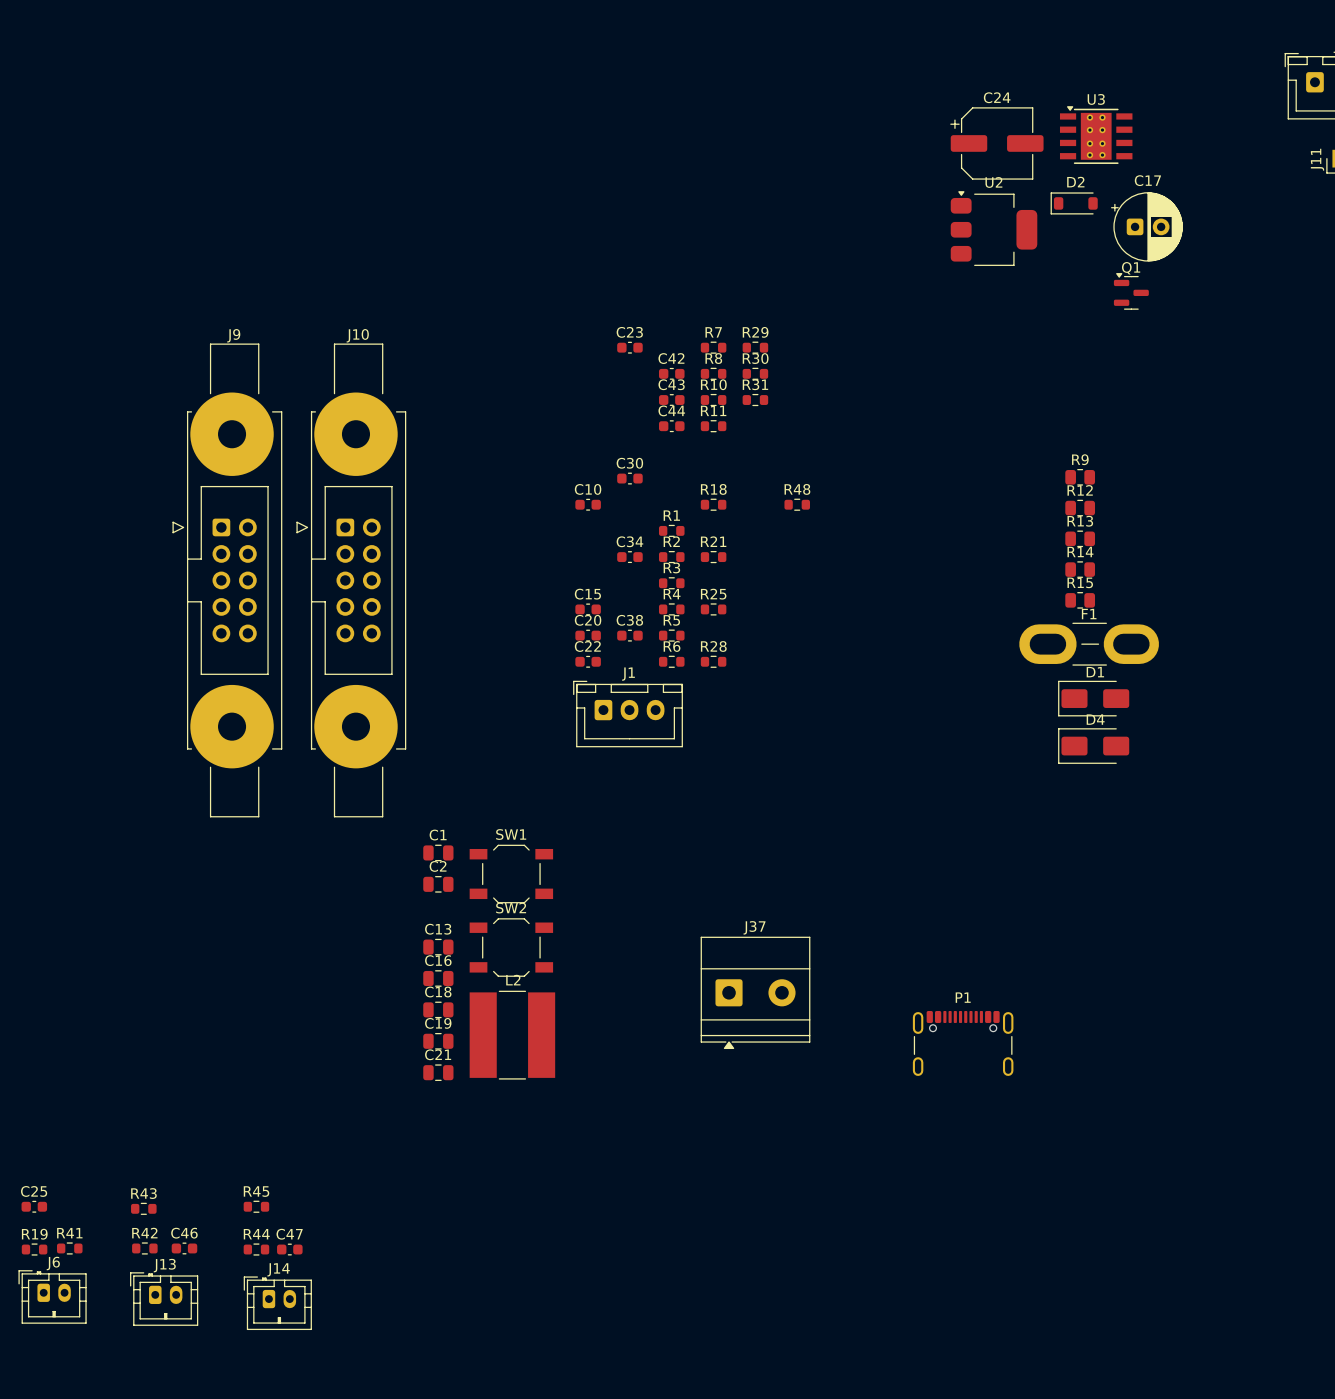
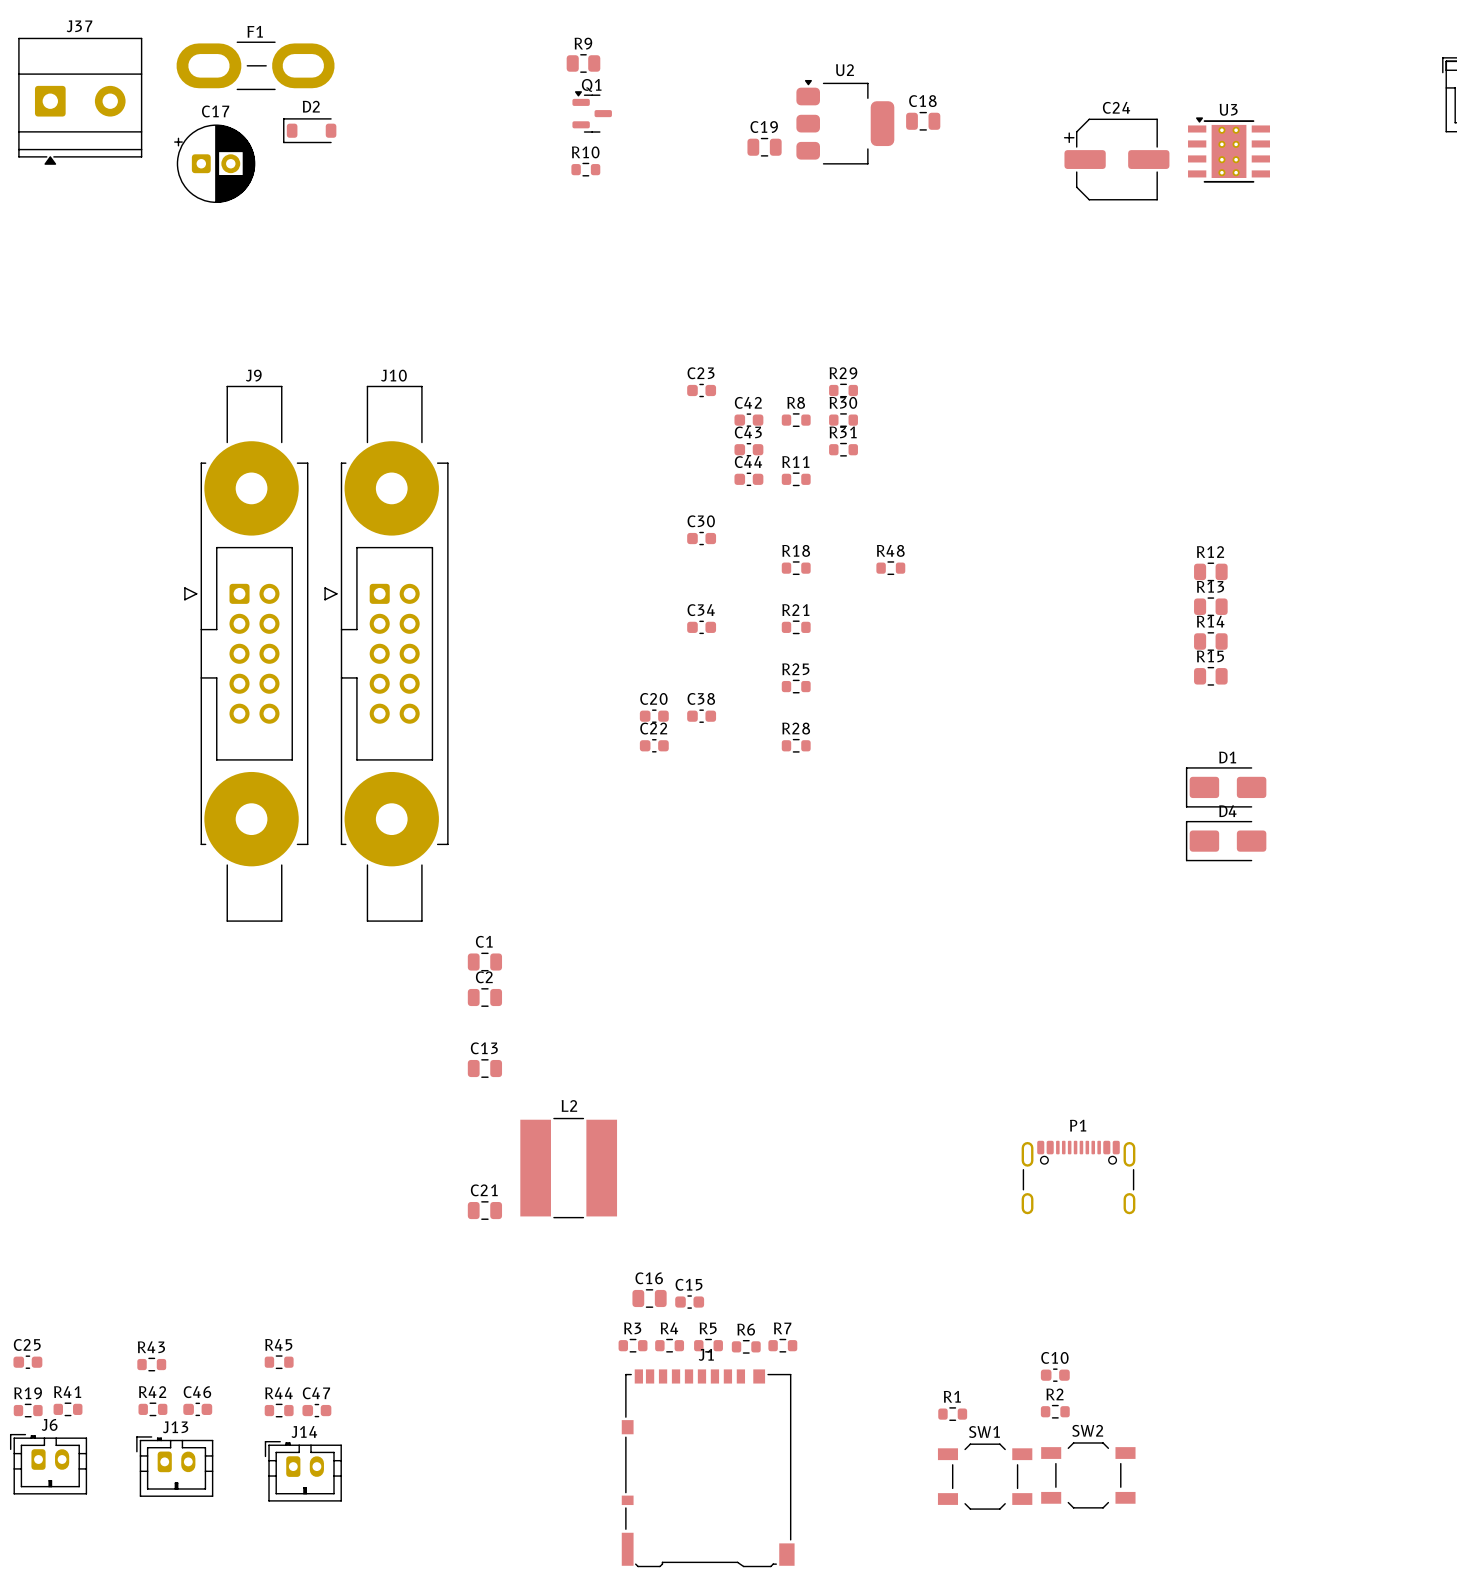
D2 position: (1074, 203) -> (309, 130)
C17 position: (1146, 226) -> (214, 163)
U2 position: (994, 228) -> (845, 122)
Q1 position: (1131, 291) -> (592, 111)
R7 position: (713, 347) -> (782, 1345)
R10 position: (713, 400) -> (585, 169)
R9 position: (1080, 477) -> (583, 63)
C10 position: (588, 504) -> (1055, 1375)
R1 position: (671, 530) -> (952, 1414)
R2 position: (671, 557) -> (1055, 1411)
R3 position: (671, 583) -> (633, 1345)
C15 position: (588, 609) -> (689, 1302)
R4 position: (671, 609) -> (669, 1345)
R5 position: (671, 635) -> (708, 1345)
F1 position: (1089, 644) -> (255, 65)
R6 position: (671, 661) -> (746, 1346)
J1 name position: J1 (628, 674) -> J1 (706, 1354)
J1 footprint: [573, 680, 683, 748] -> [621, 1369, 795, 1568]
SW1 position: (511, 874) -> (985, 1476)
SW2 position: (511, 947) -> (1088, 1475)
C16 position: (438, 978) -> (649, 1298)
J37 position: (755, 992) -> (80, 101)
C18 position: (438, 1009) -> (923, 121)
C19 position: (438, 1041) -> (764, 147)

